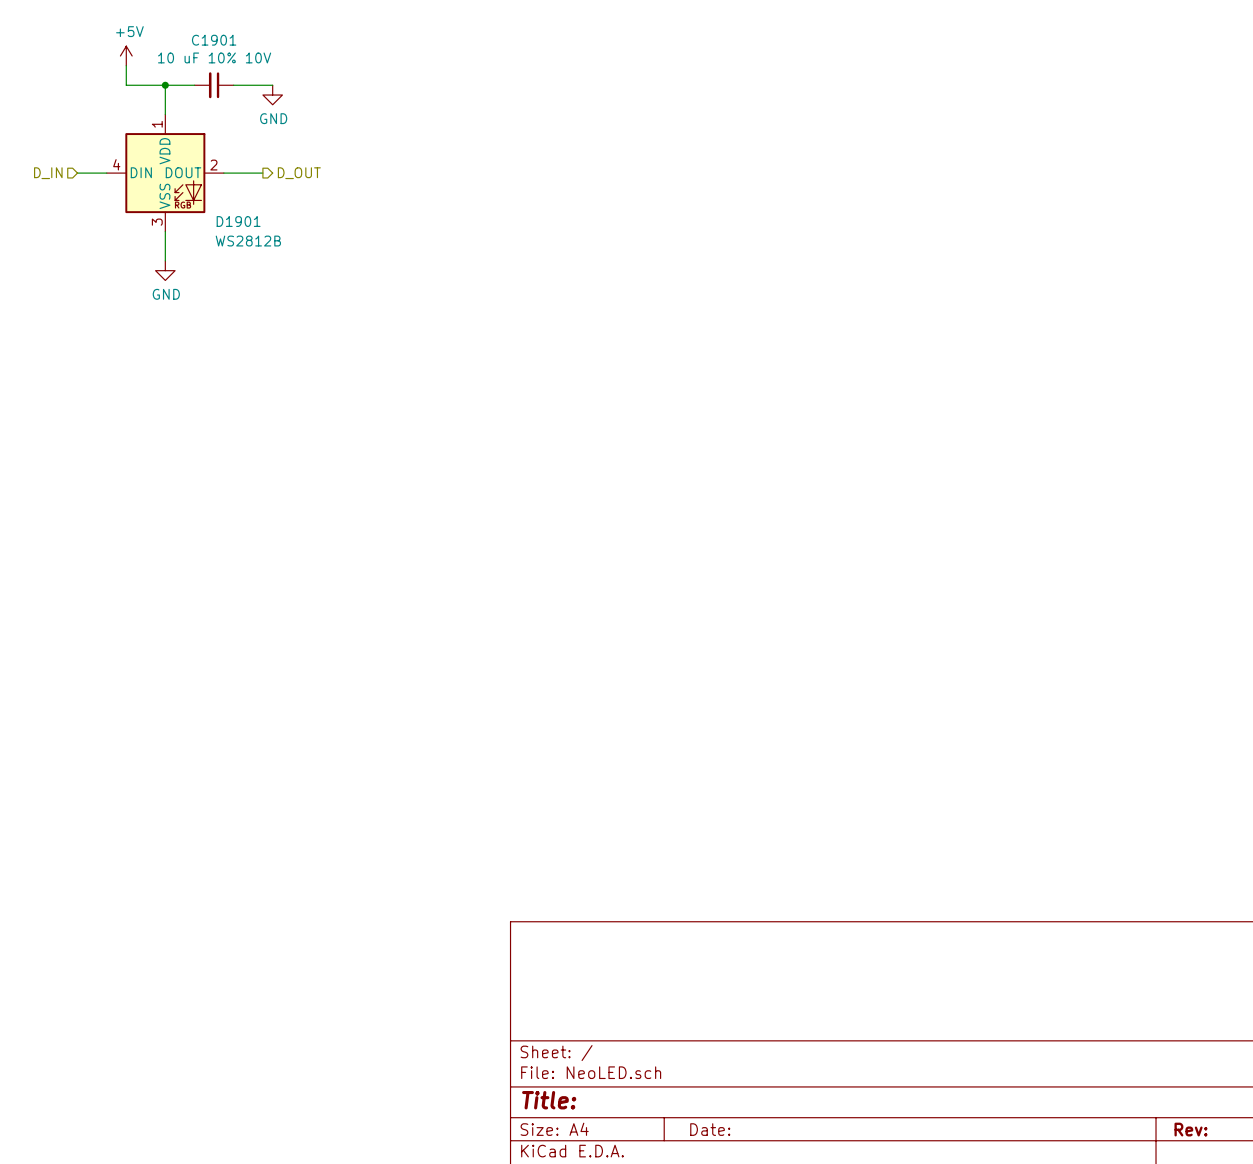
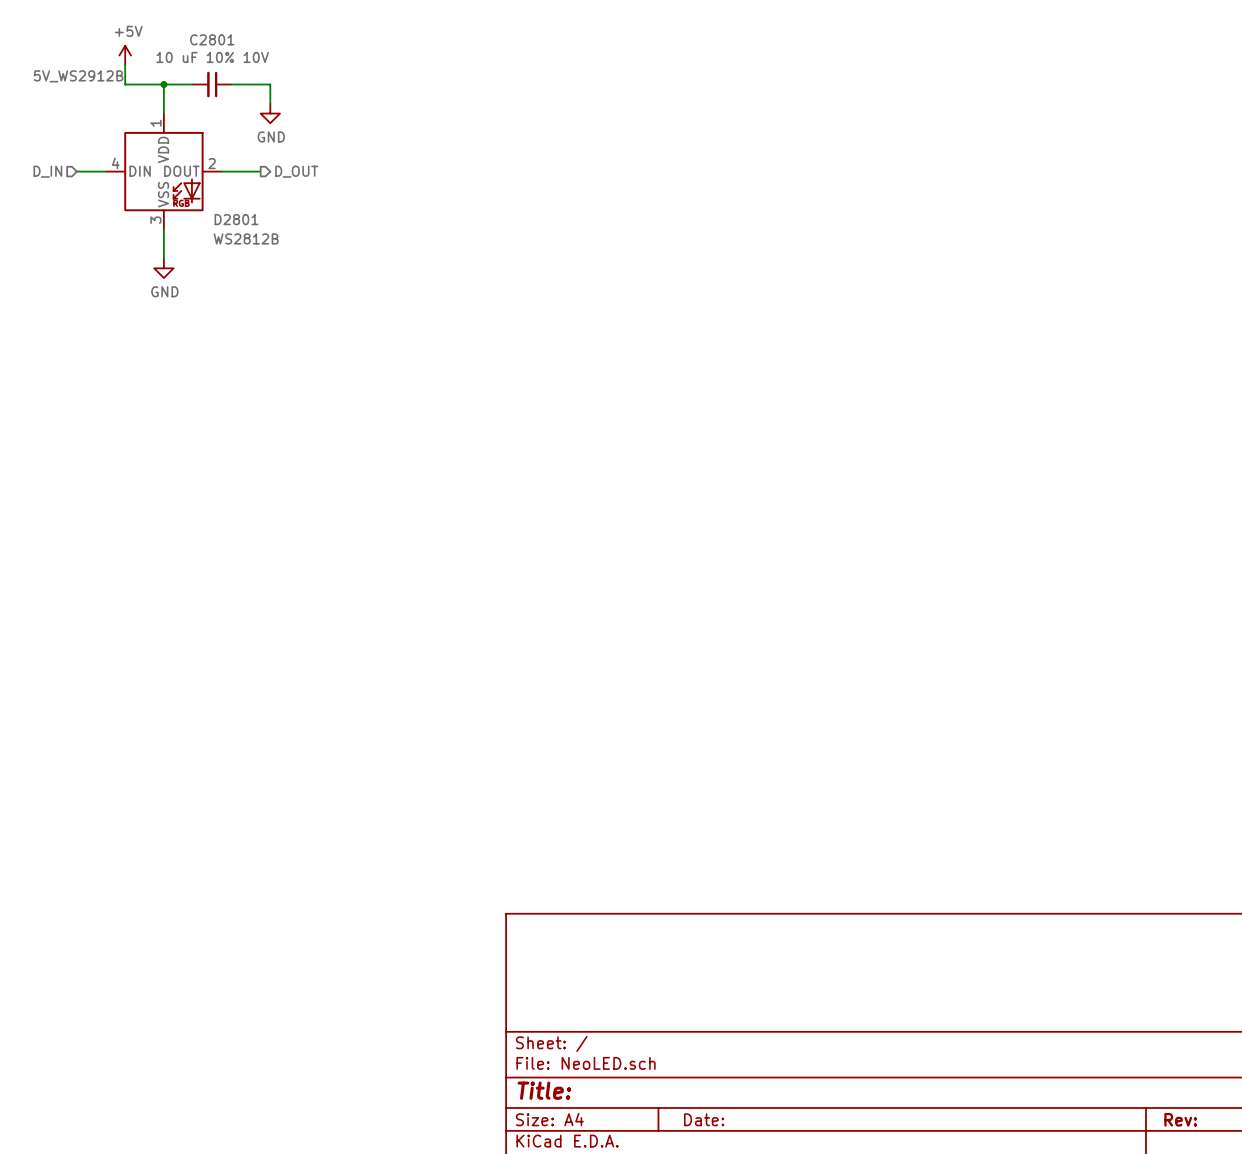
C1901 name: C1901 (214, 40) -> C2801 (212, 39)
label: none -> 5V_WS2912B (78, 76)
power symbol position: GND (272, 95) -> GND (270, 113)
D1901 name: D1901 (238, 221) -> D2801 (236, 219)

